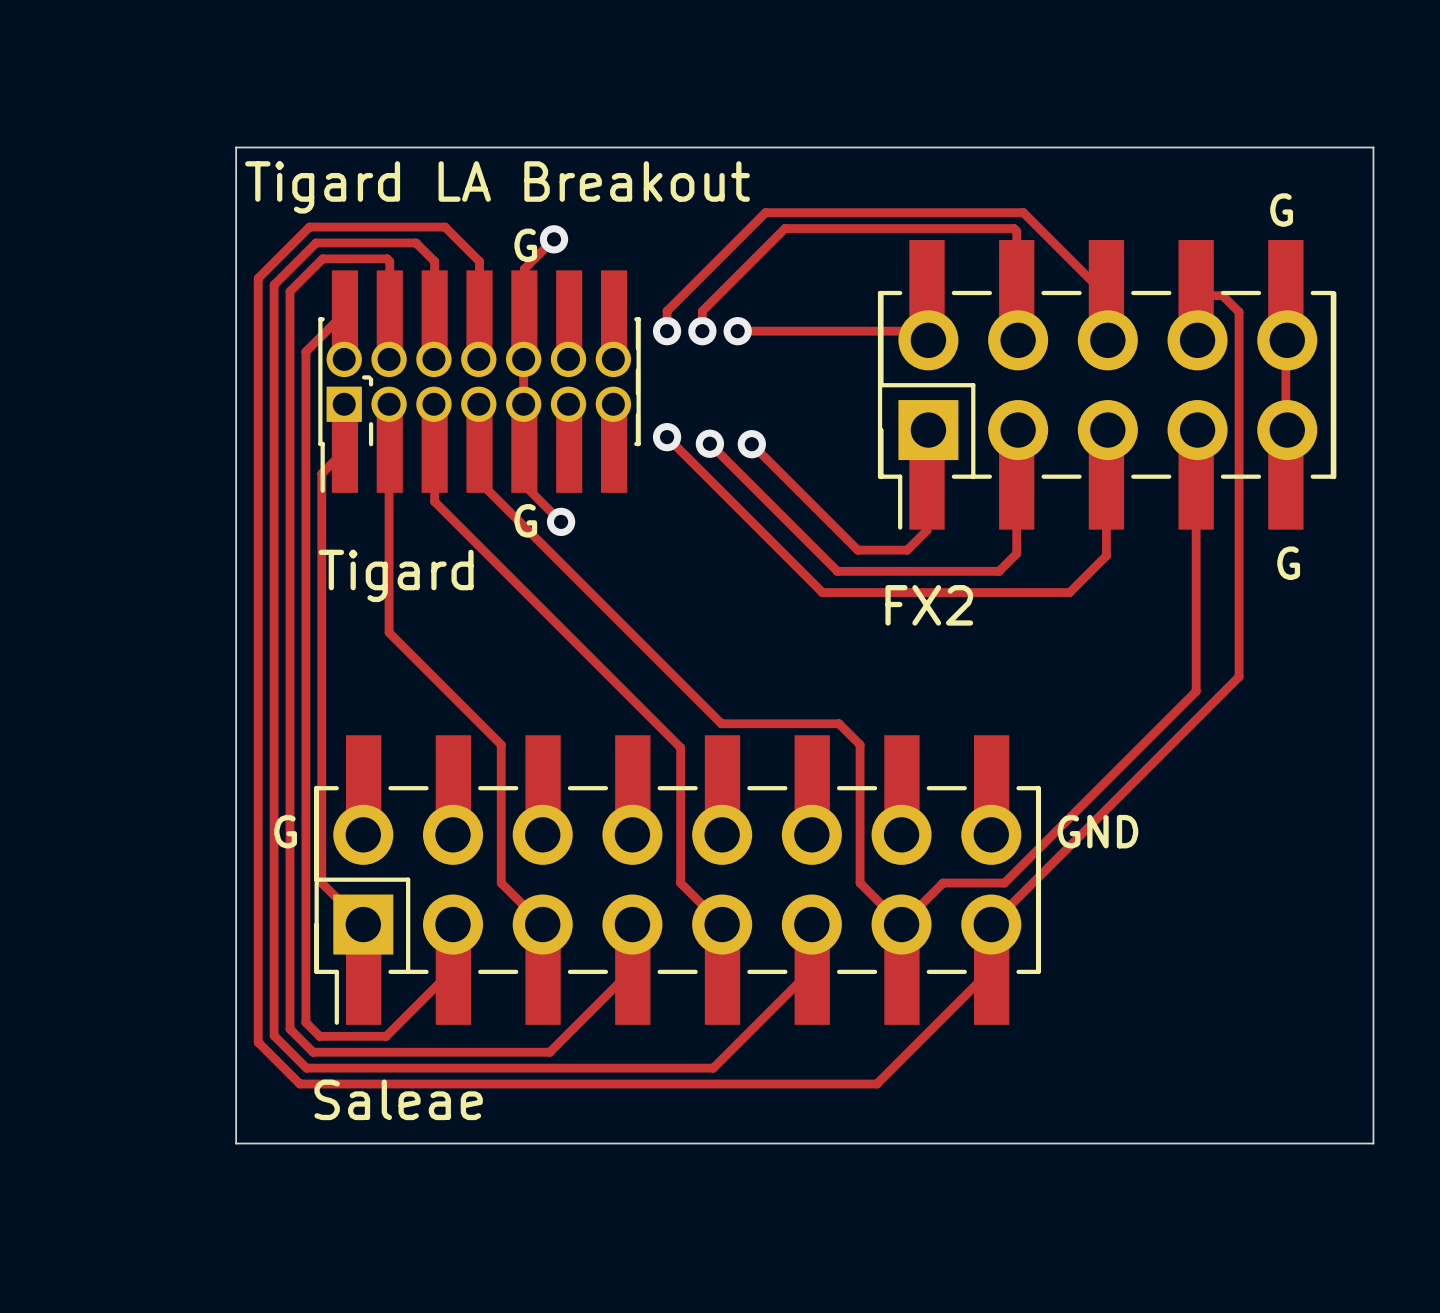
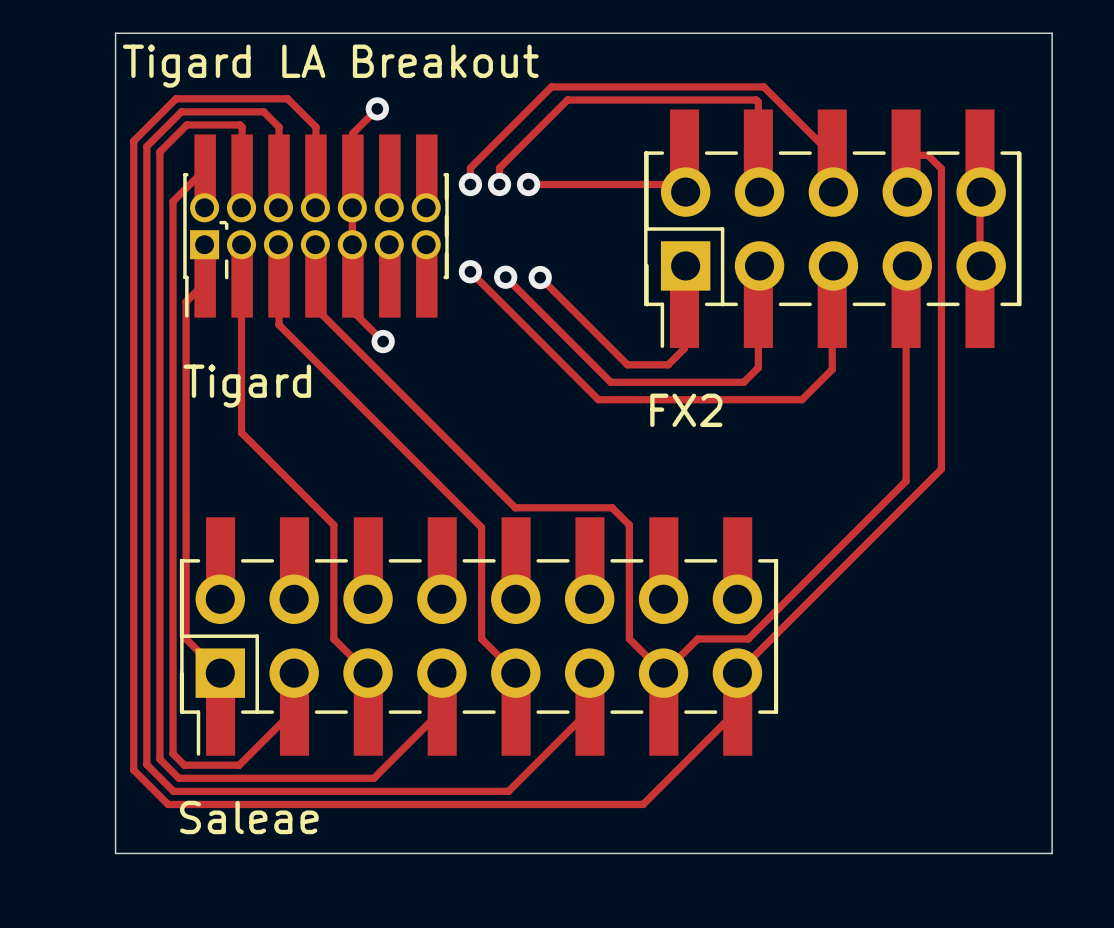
text: G (1281, 210) -> none
text: G (525, 245) -> none
text: G (525, 520) -> none
text: G (1288, 563) -> none
text: G (285, 831) -> none
text: GND (1097, 831) -> none

